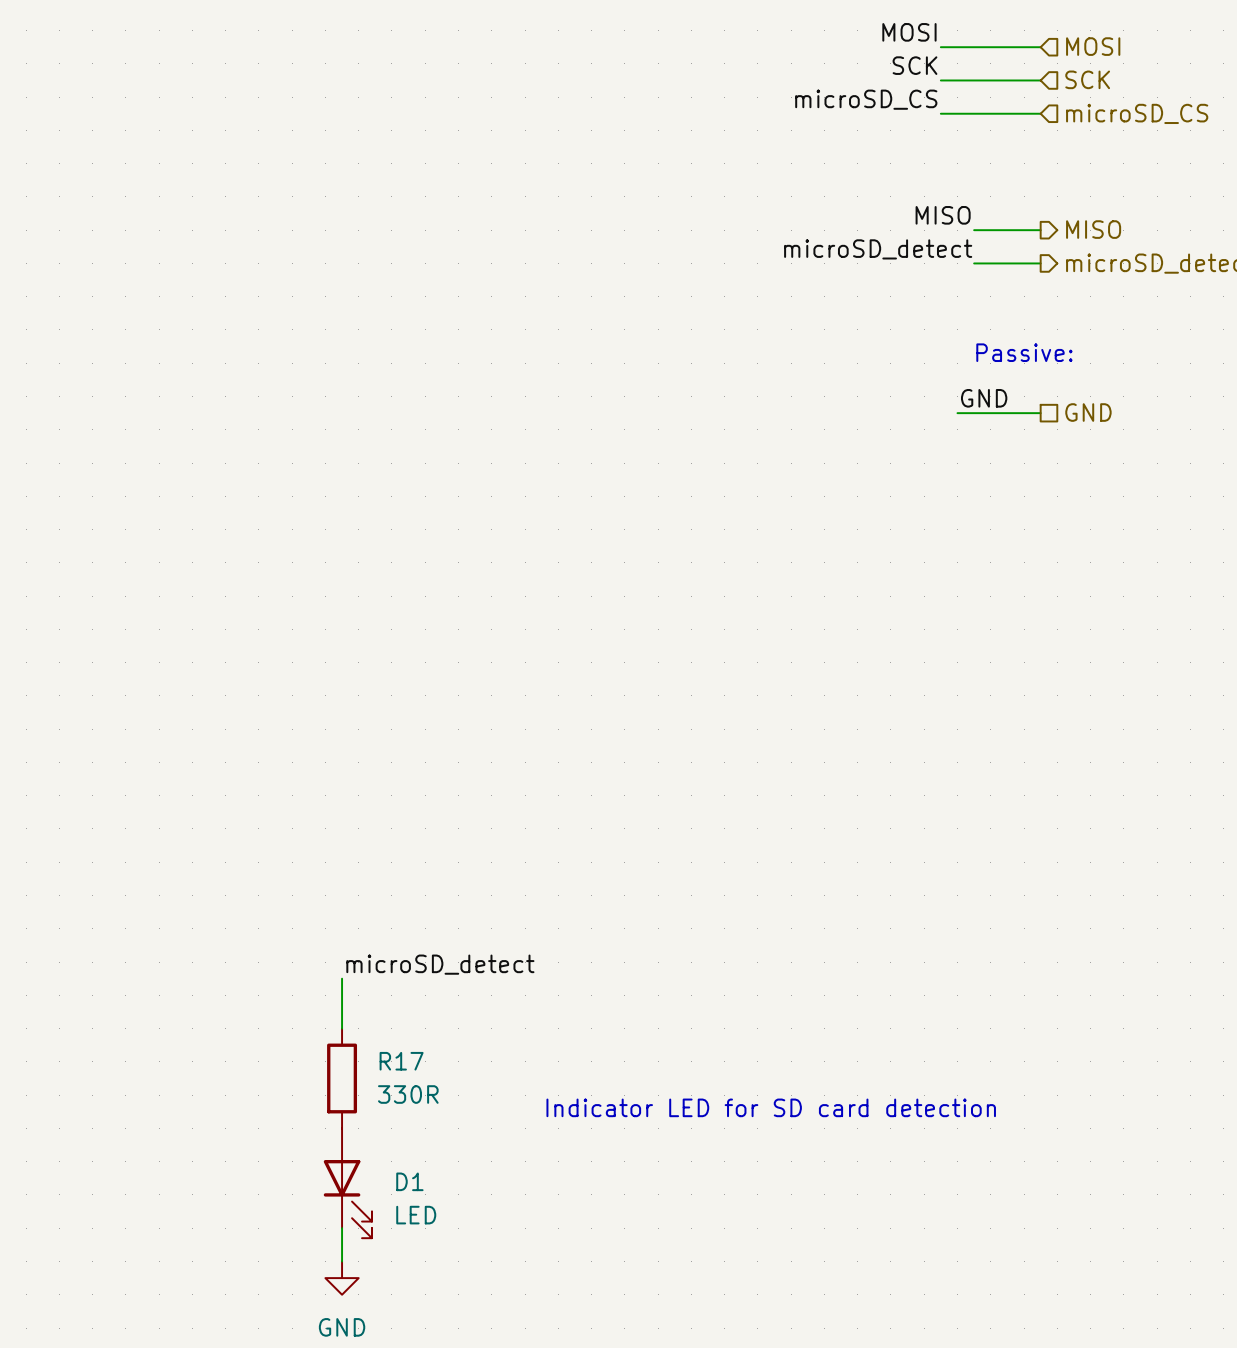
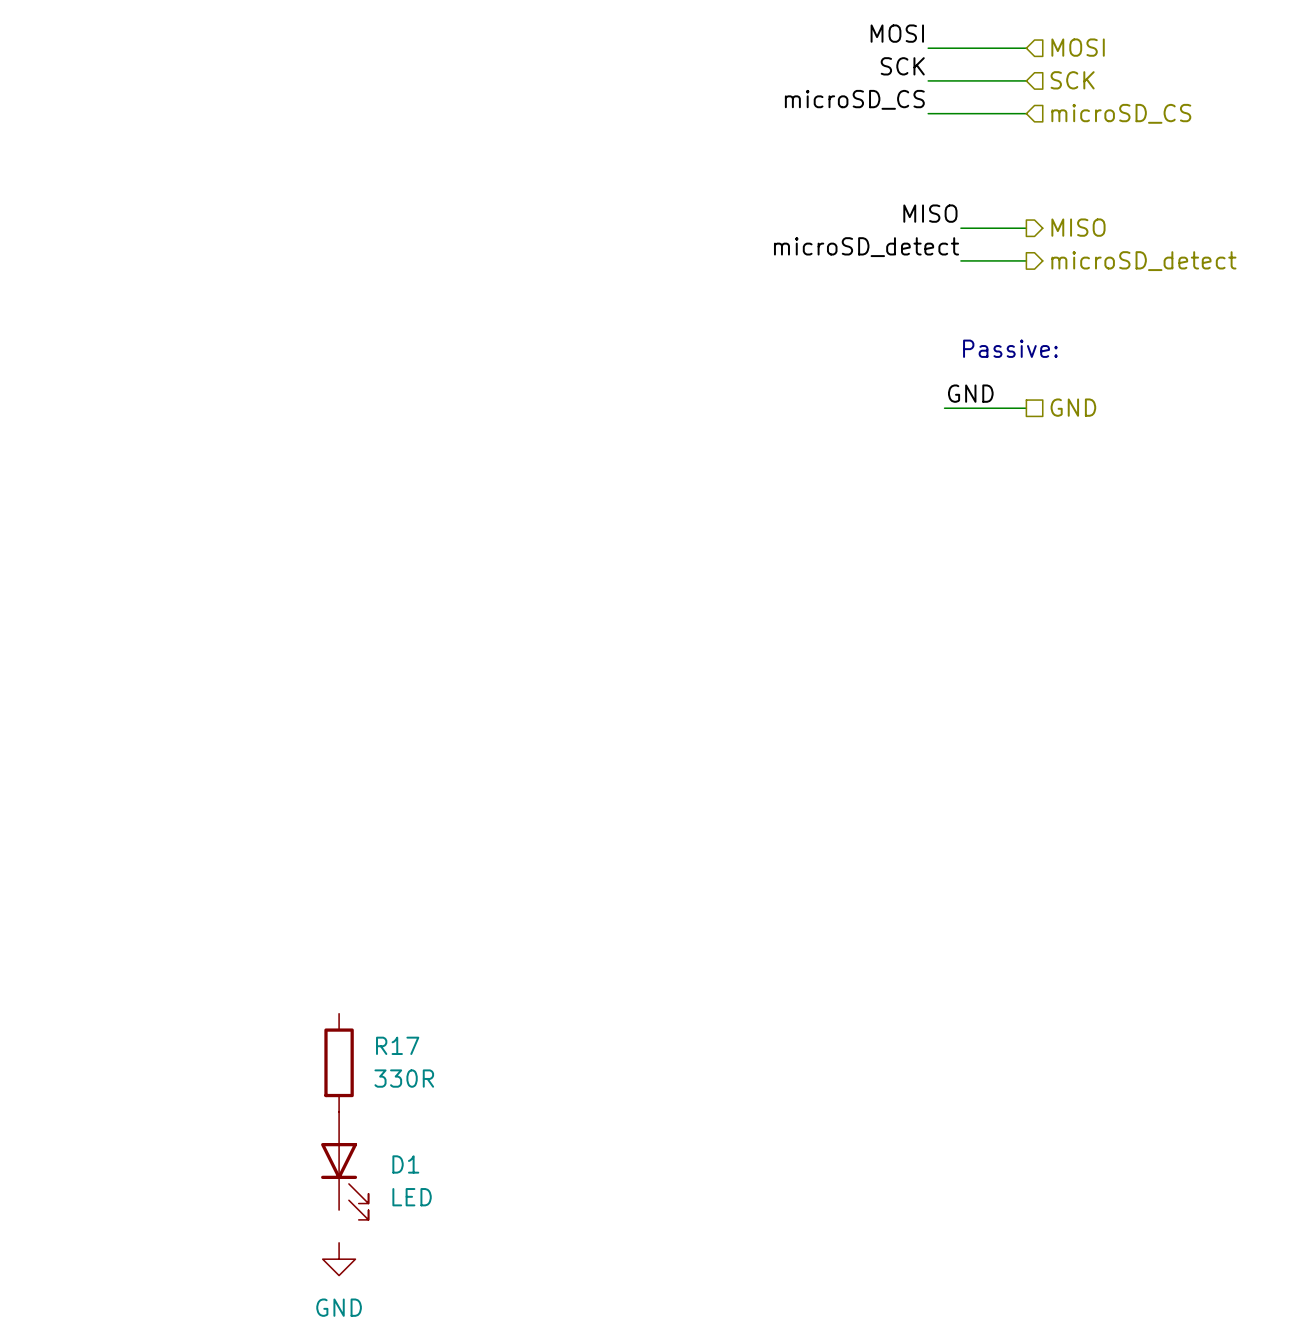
label: microSD_detect (440, 964) -> none
wire: (342, 978) (342, 1028) -> none
text: Indicator LED for SD card detection (771, 1107) -> none
wire: (342, 1228) (342, 1261) -> none

